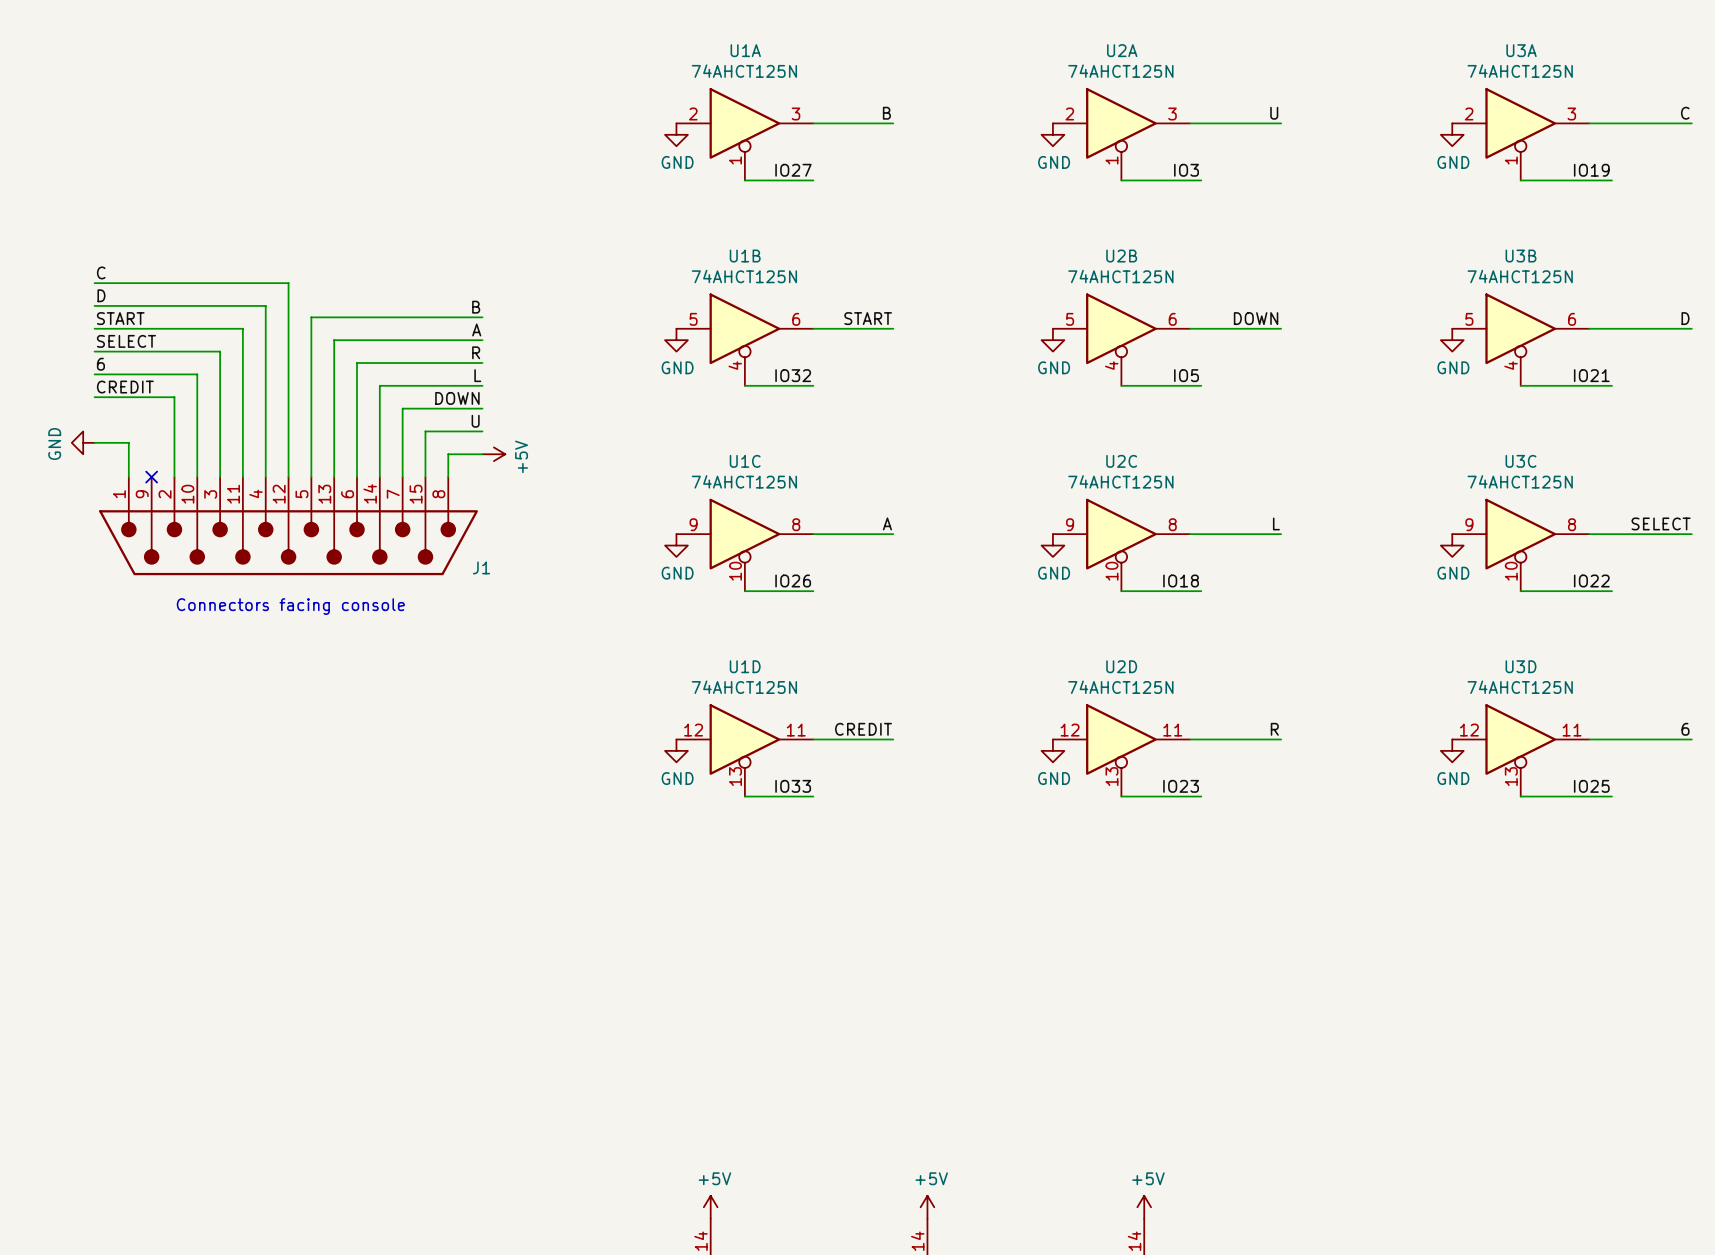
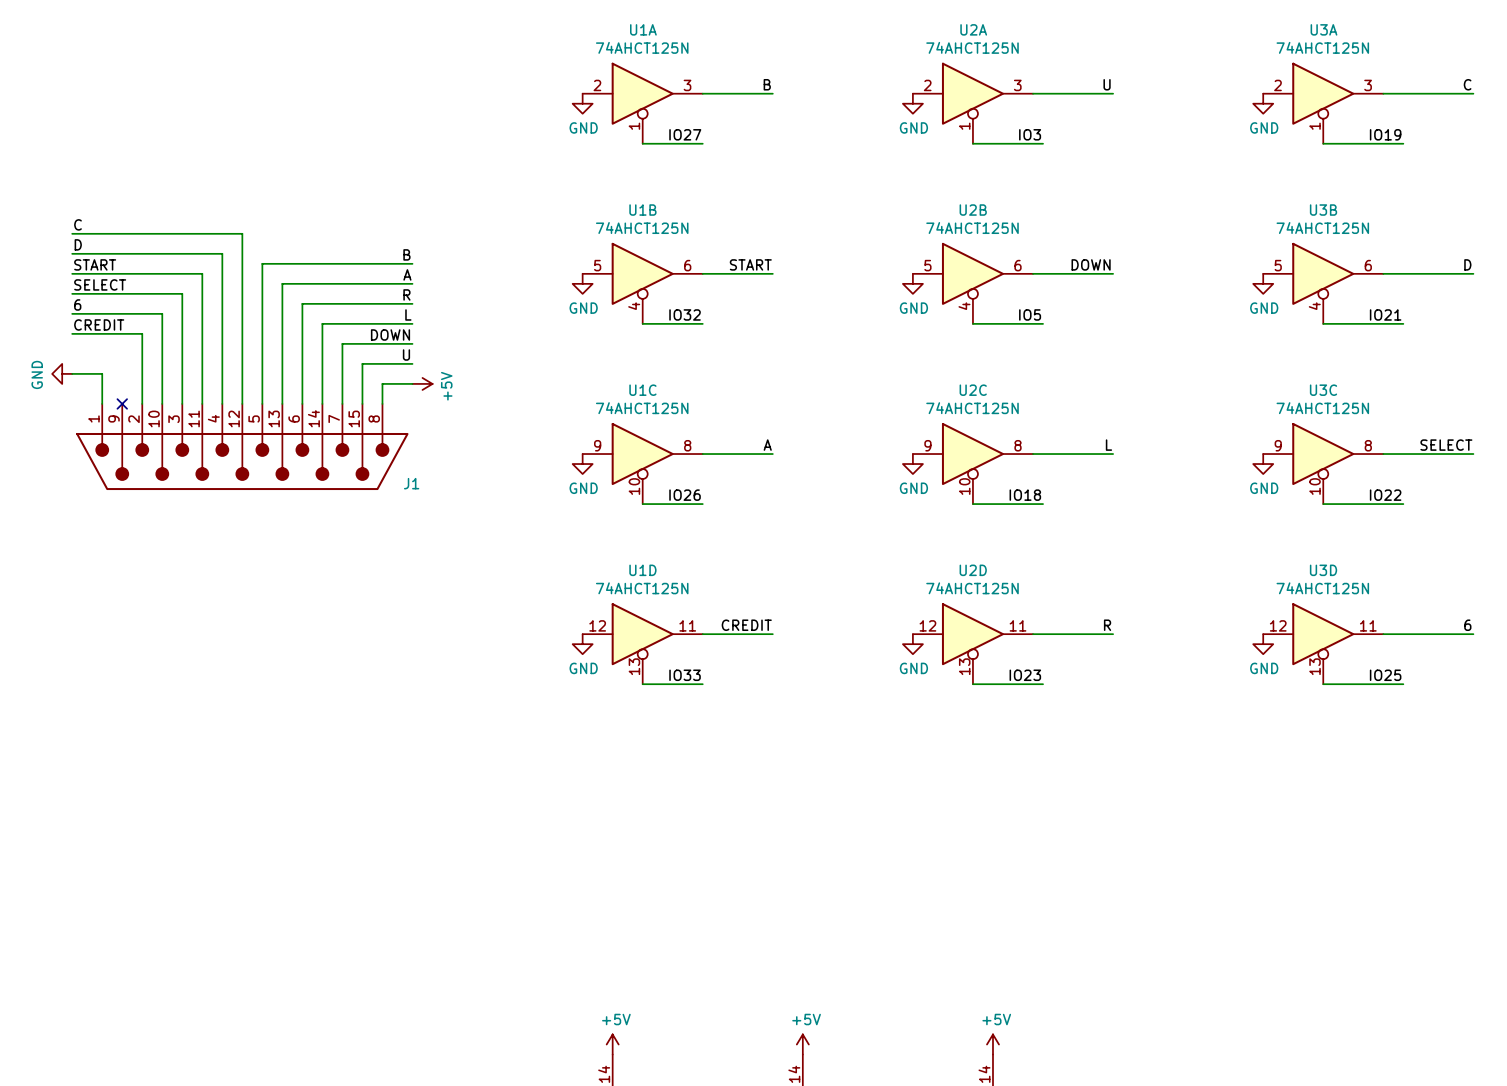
text: Connectors facing console (290, 606) -> none

